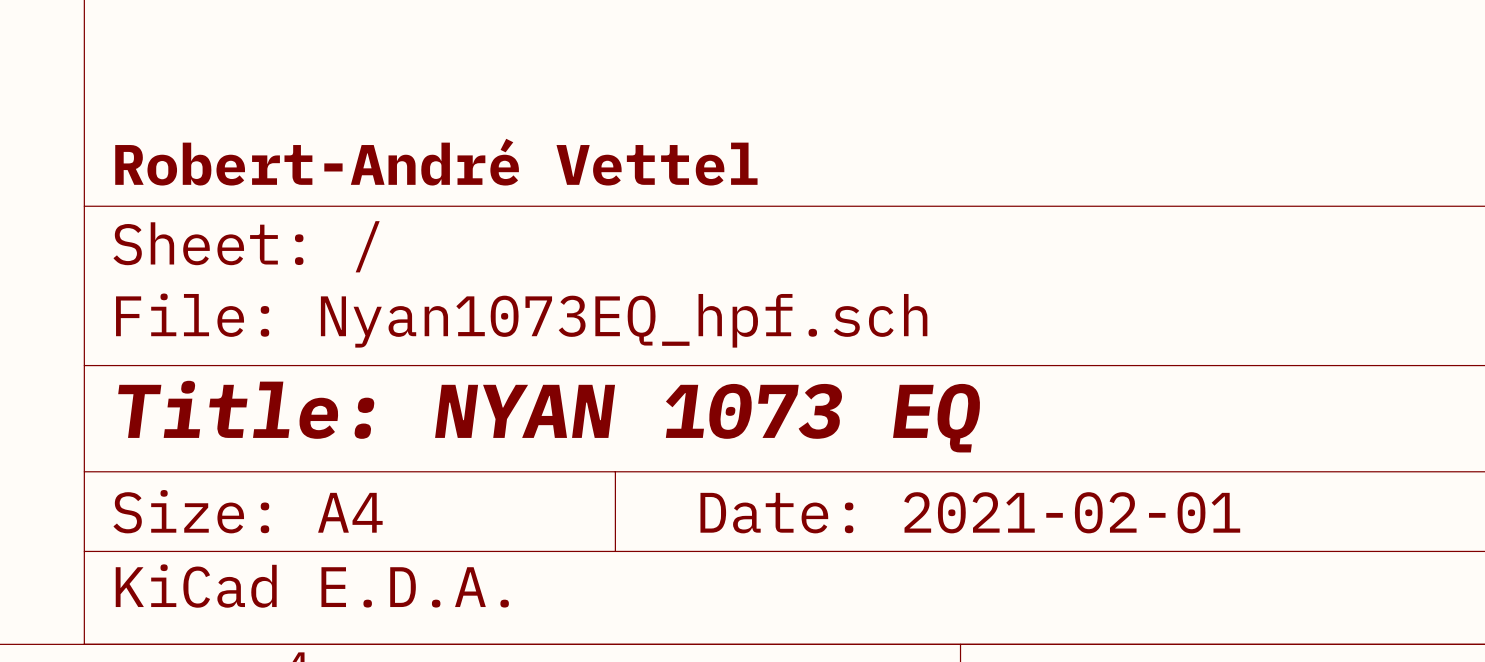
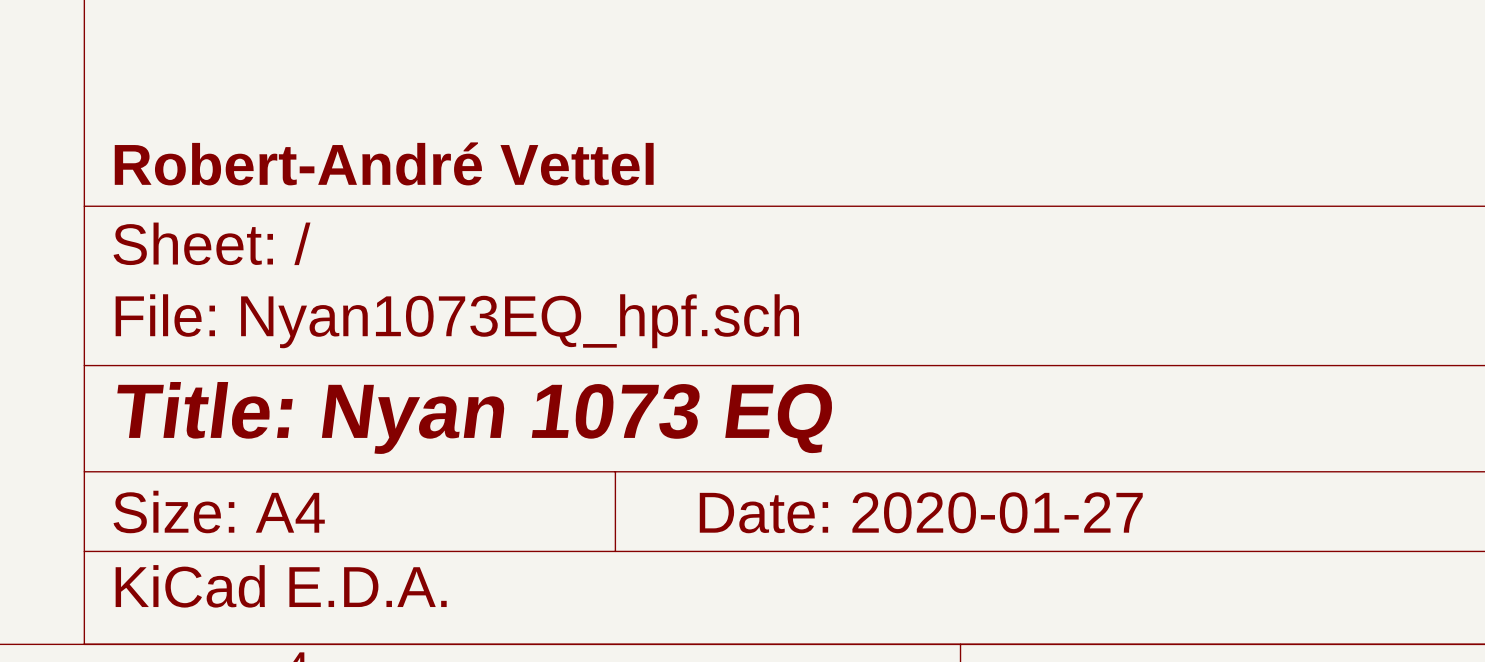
title block: Title: NYAN 1073 EQ (549, 416) -> Title: Nyan 1073 EQ (475, 417)
title block: Date: 2021-02-01 (970, 512) -> Date: 2020-01-27 (921, 512)

